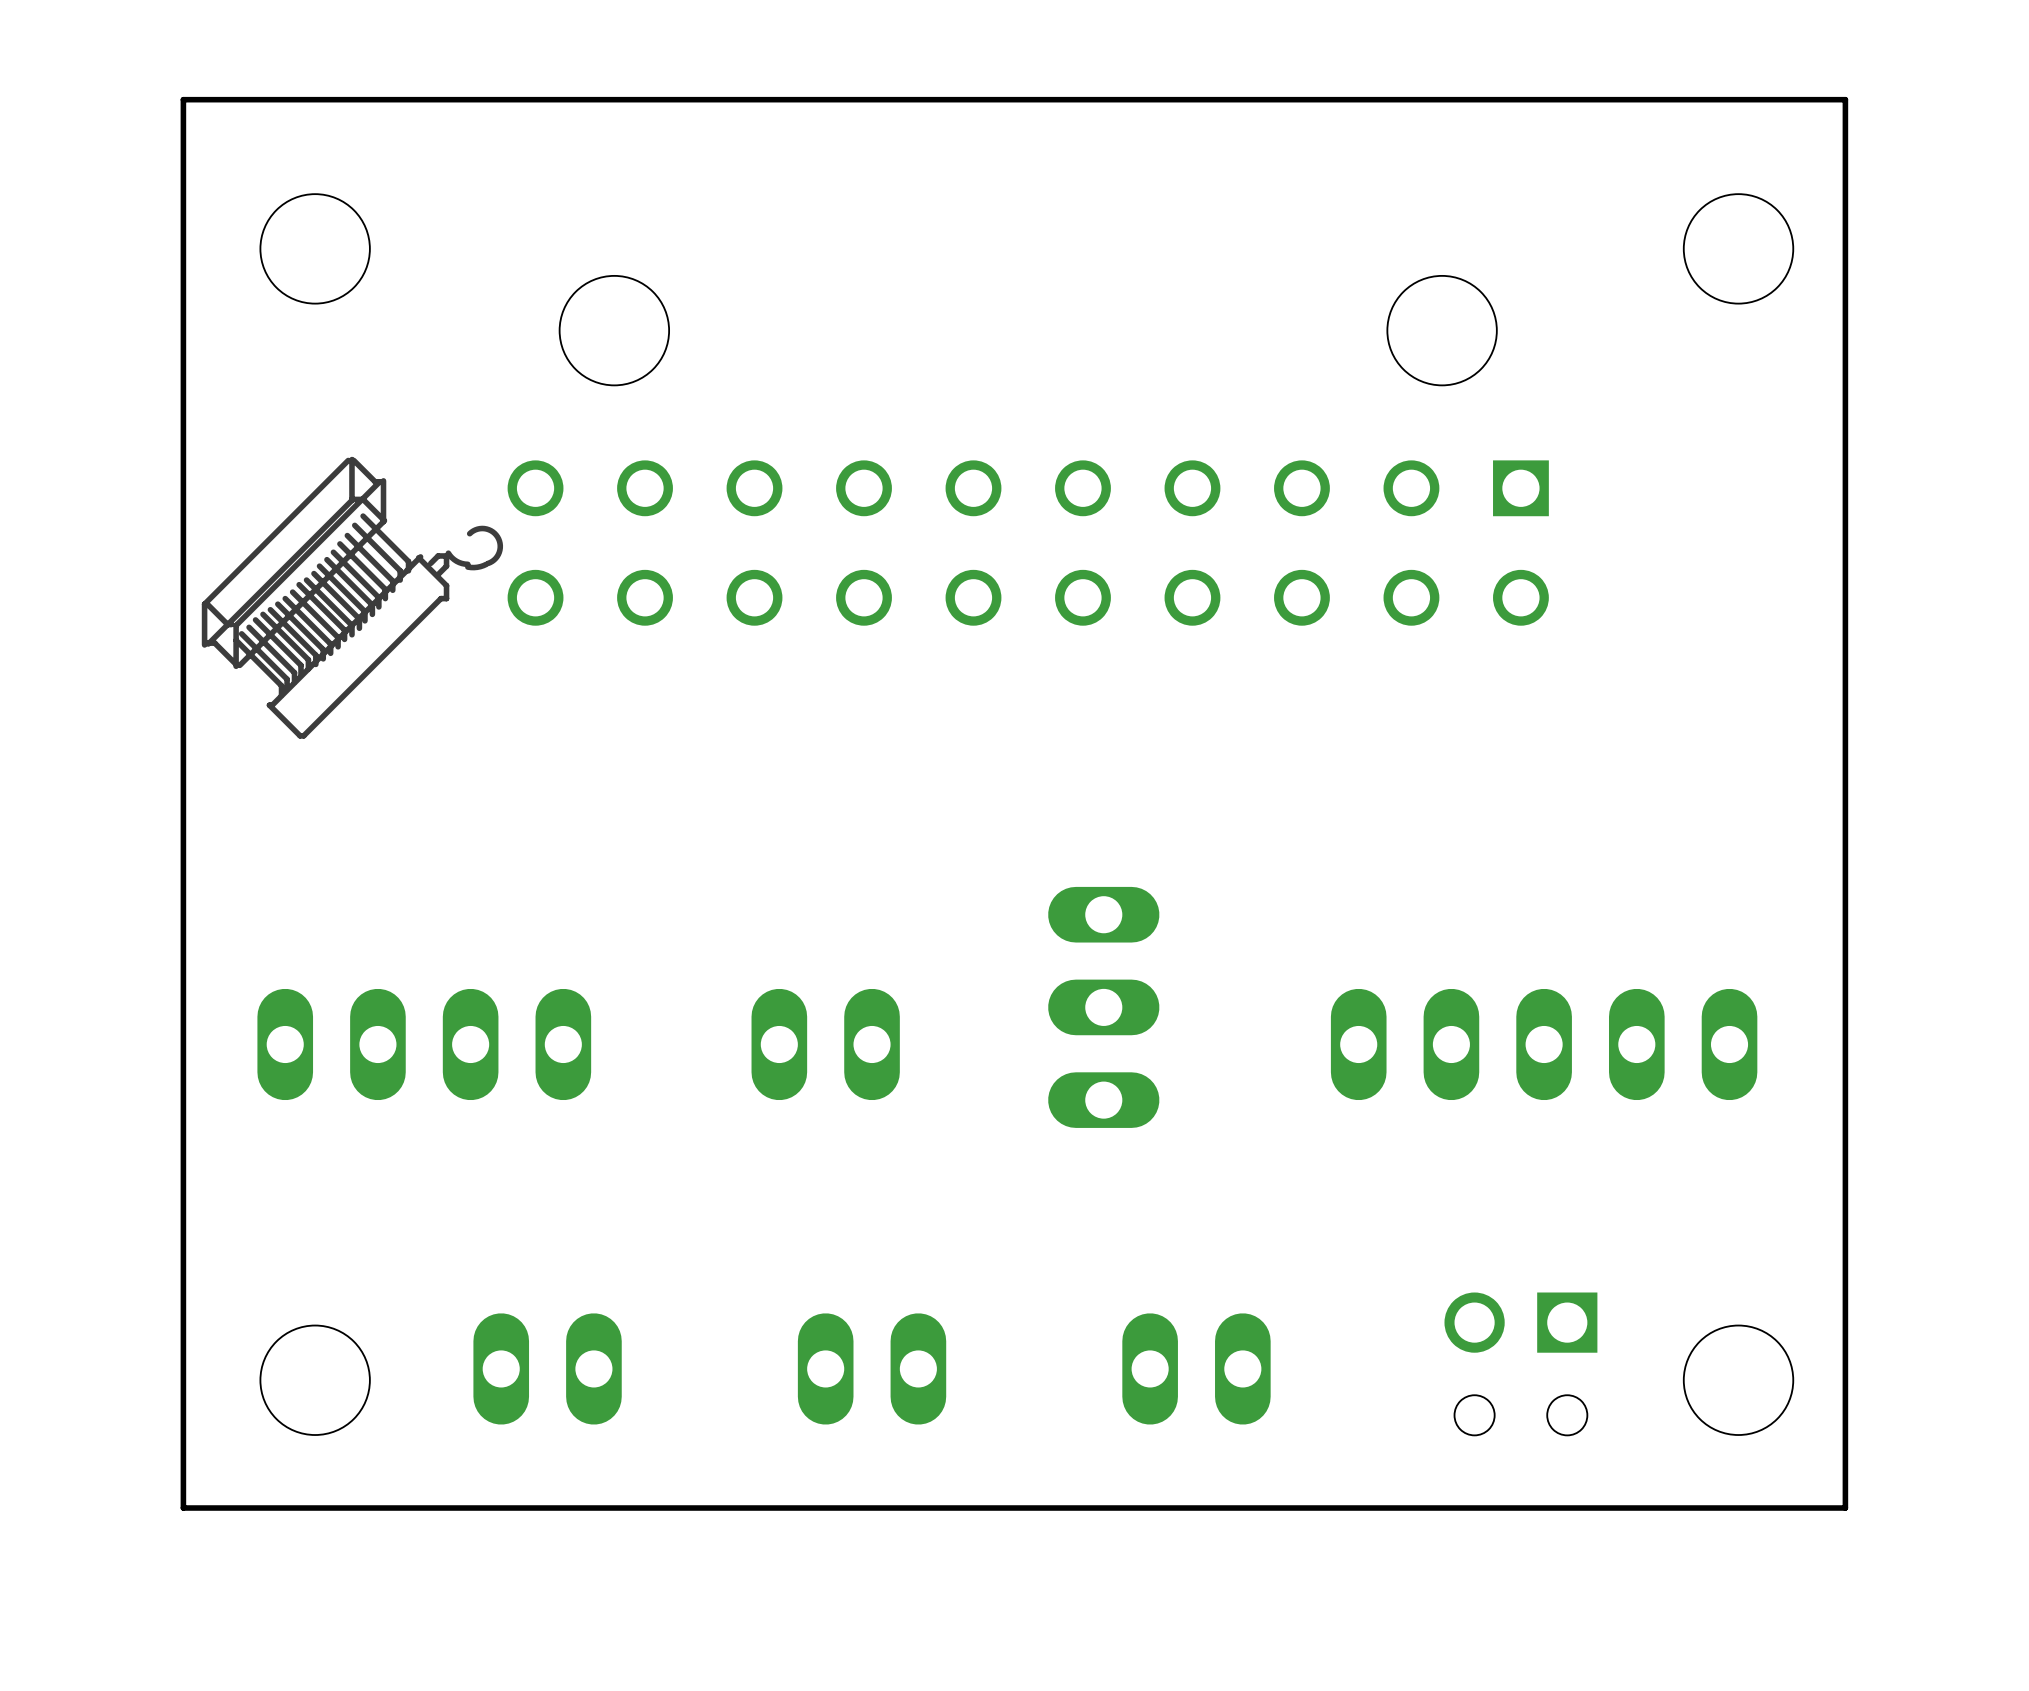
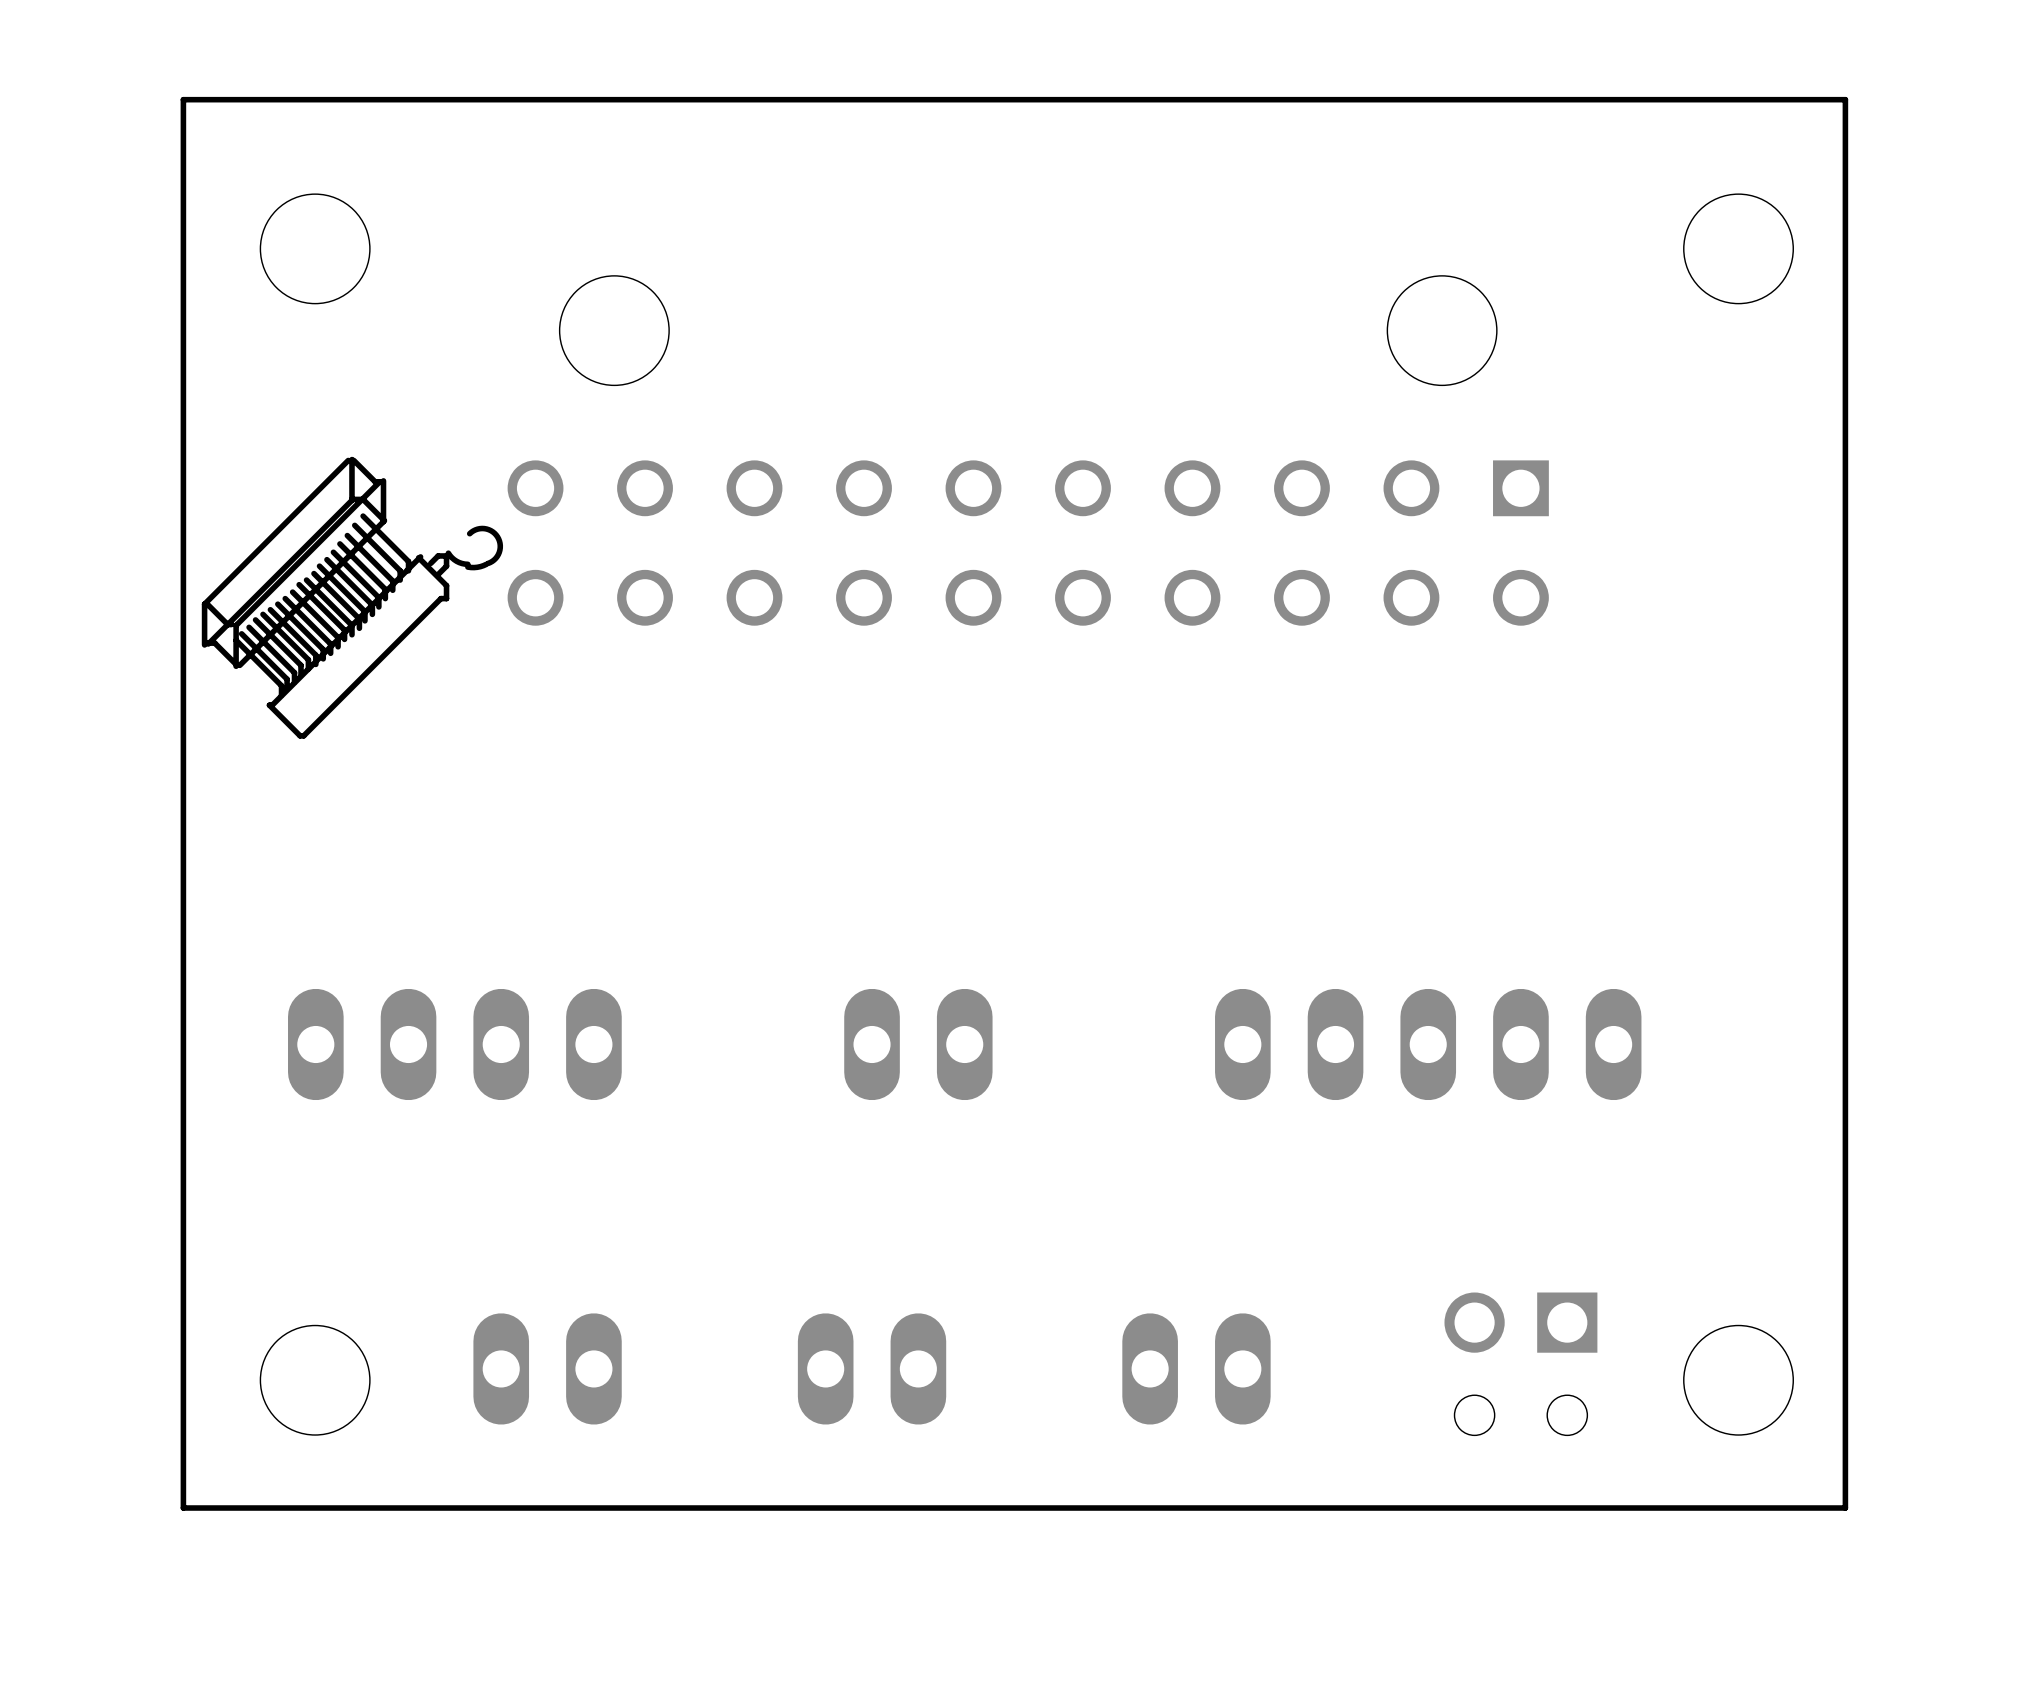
part: (1103, 1007) -> none
part position: (424, 1044) -> (454, 1044)
part position: (825, 1044) -> (918, 1044)
part position: (1544, 1044) -> (1428, 1044)

